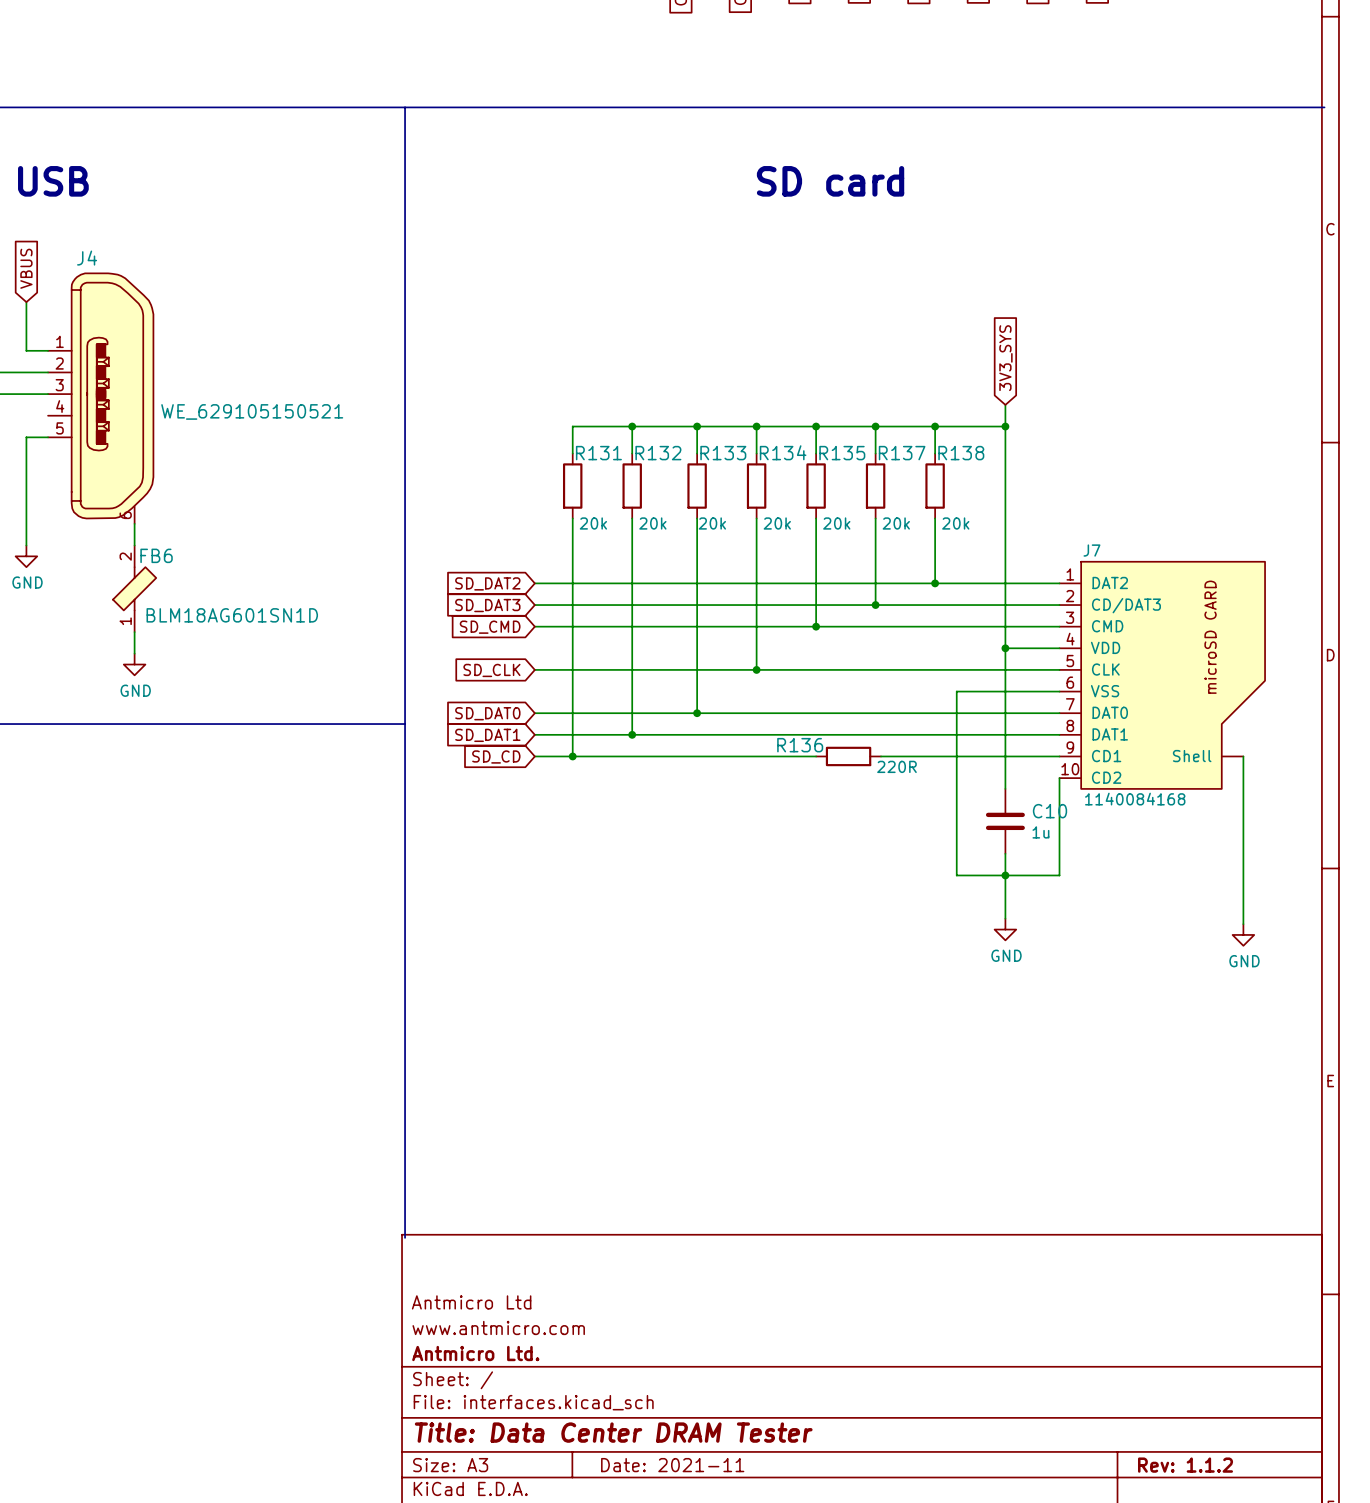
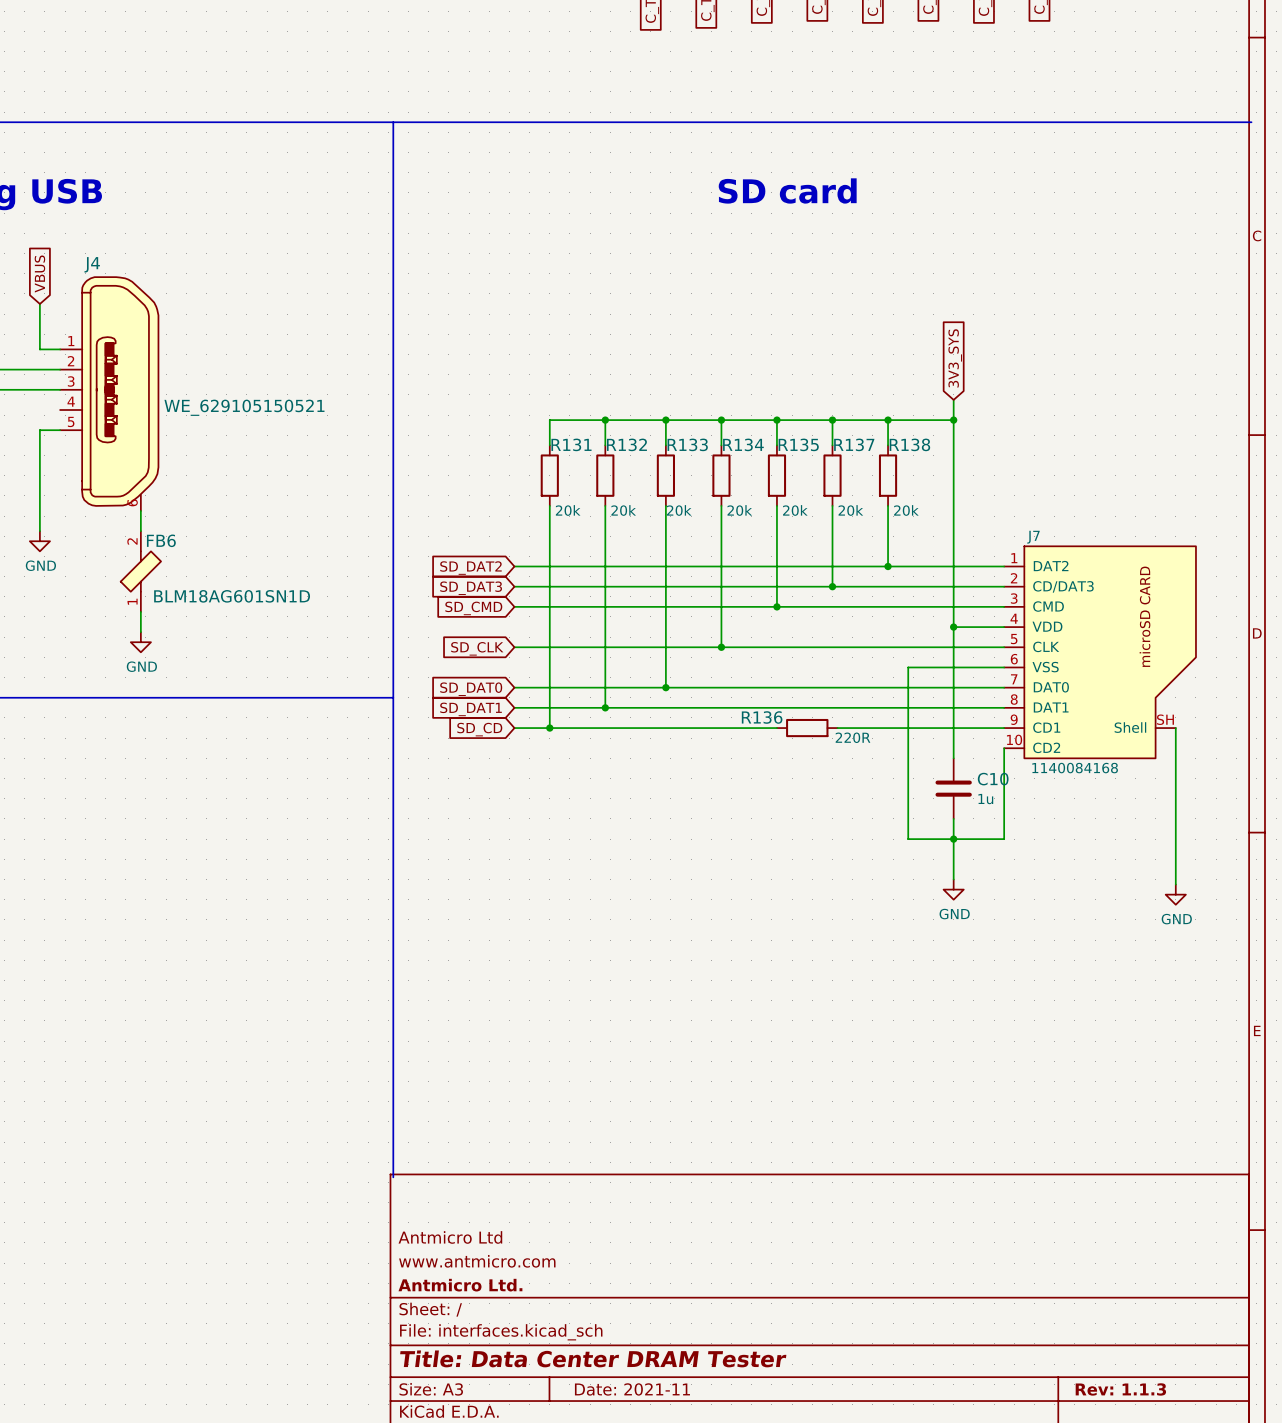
J7 pin number: none -> SH (1165, 719)
title block: Rev: 1.1.2 (1185, 1465) -> Rev: 1.1.3 (1120, 1389)

